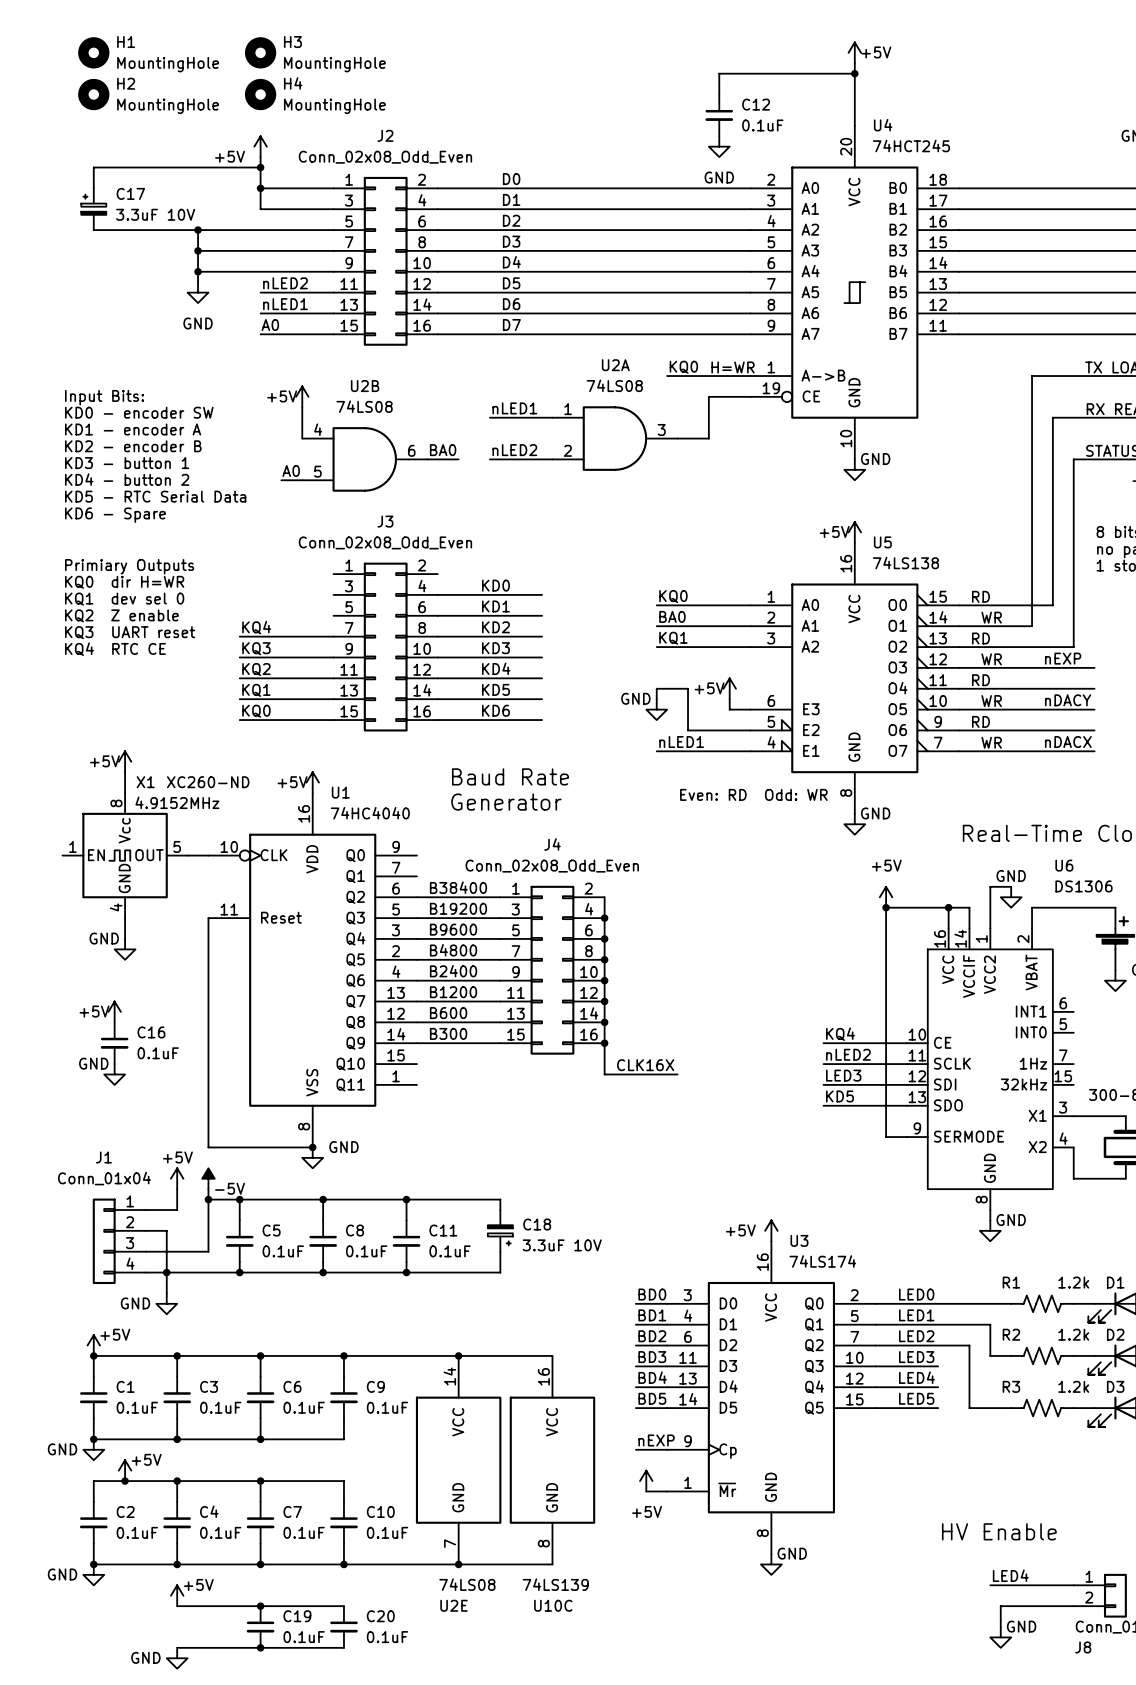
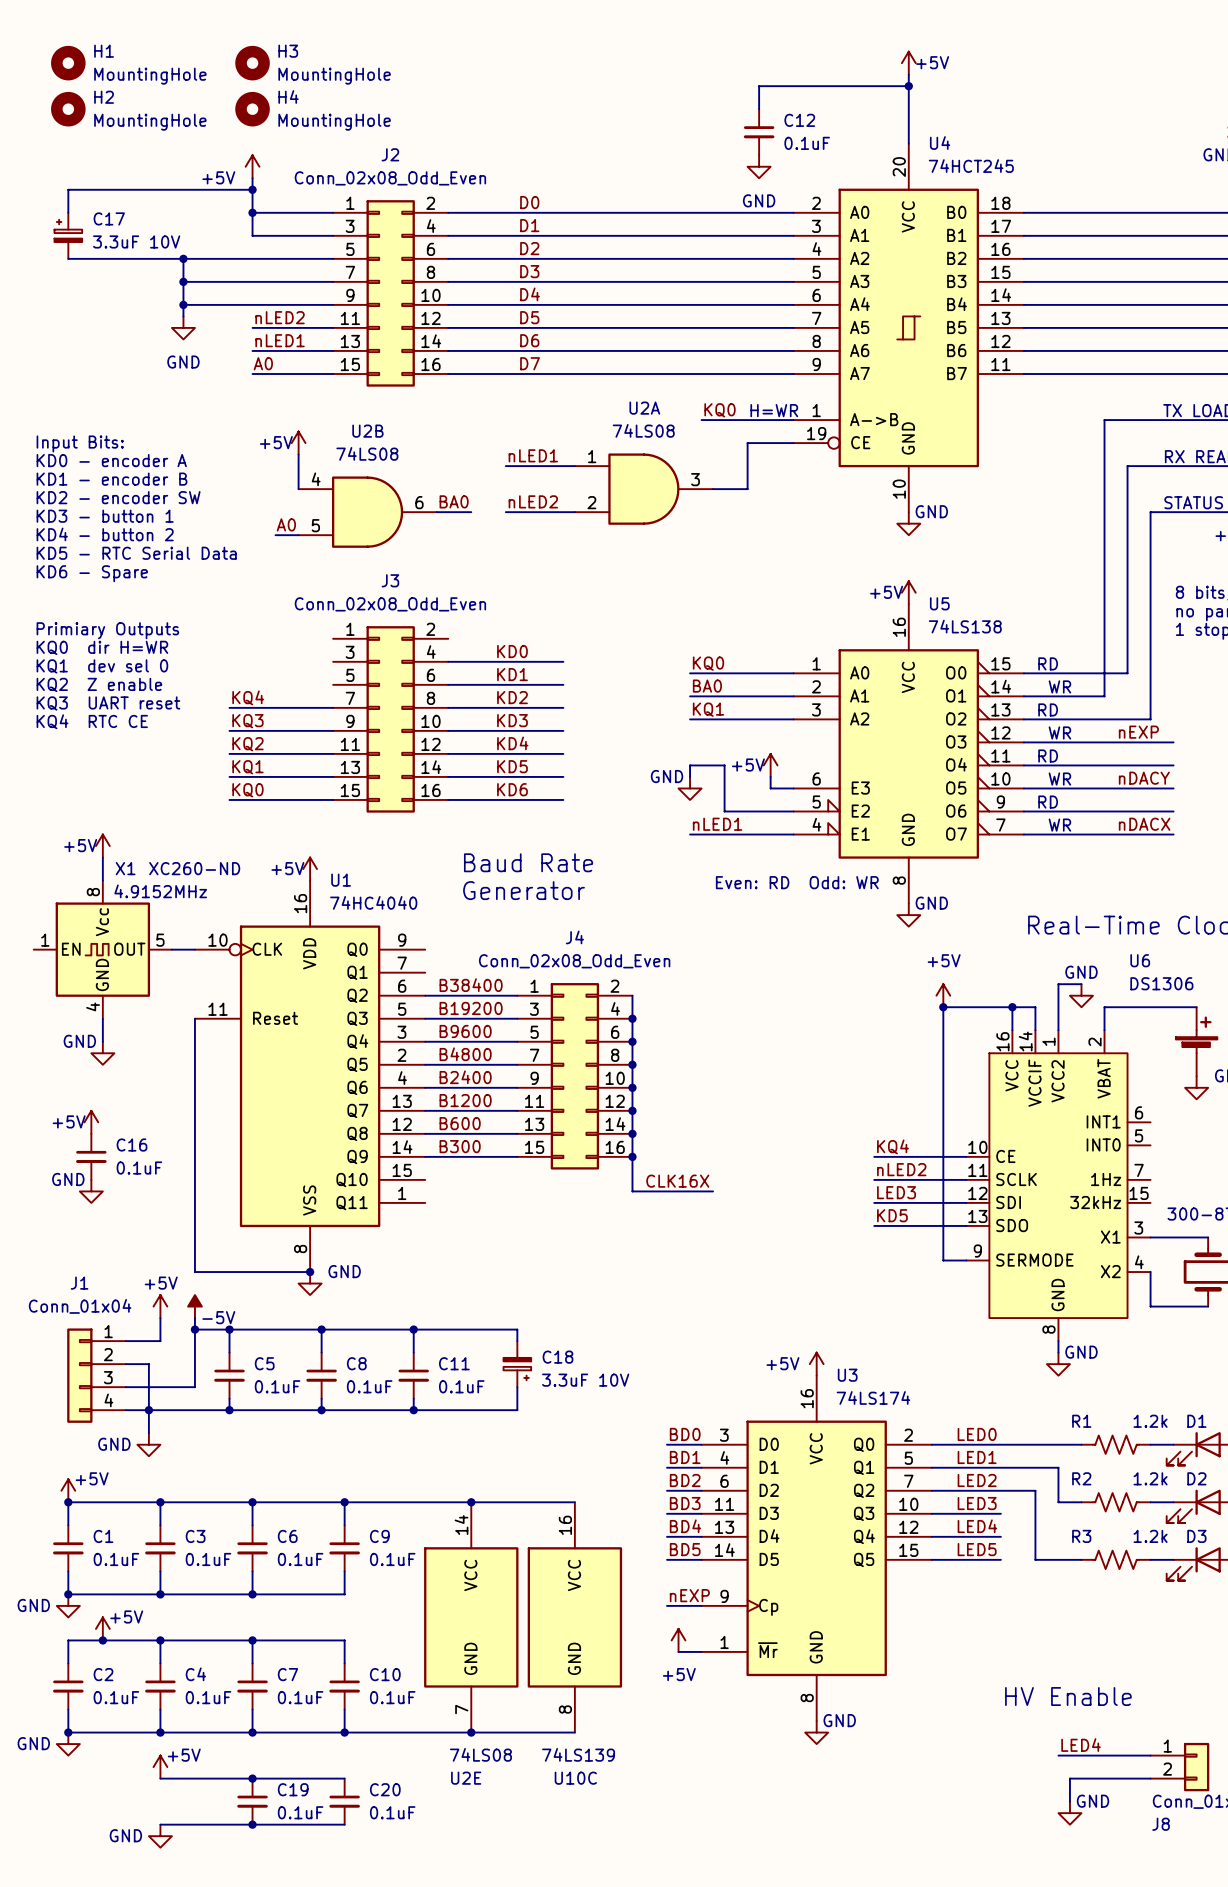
text: KD0 - encoder SW (139, 412) -> KD0 - encoder A (111, 460)
text: KD1 - encoder A (133, 429) -> KD1 - encoder B (112, 479)
text: KD2 - encoder B (133, 446) -> KD2 - encoder SW (118, 497)

